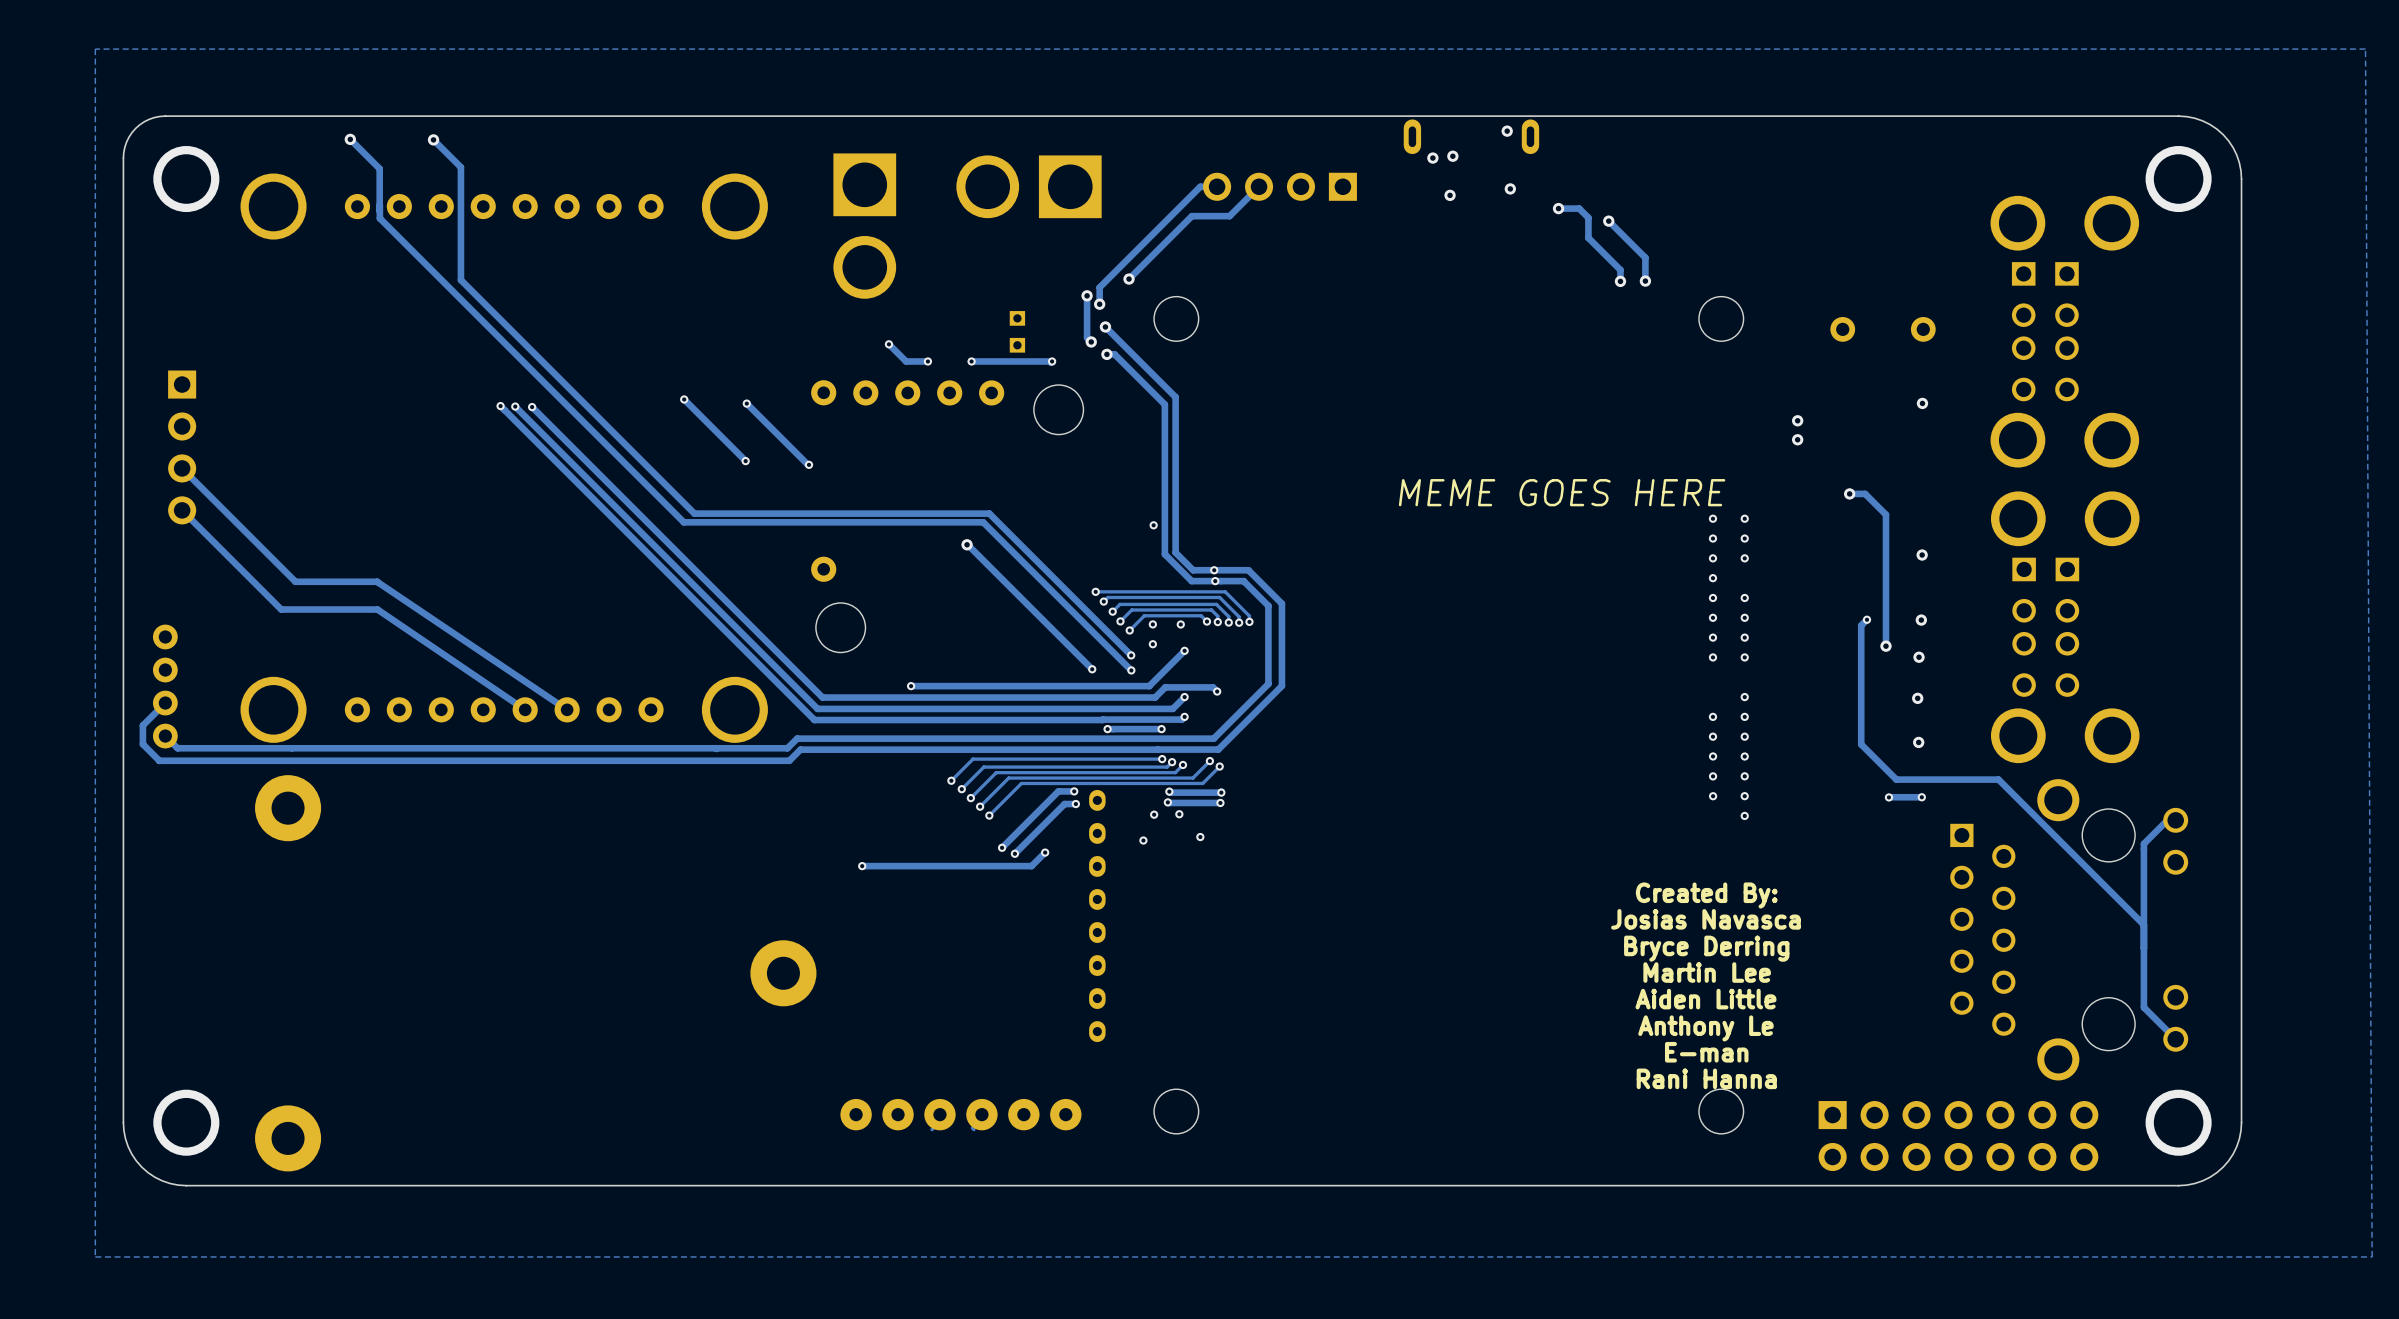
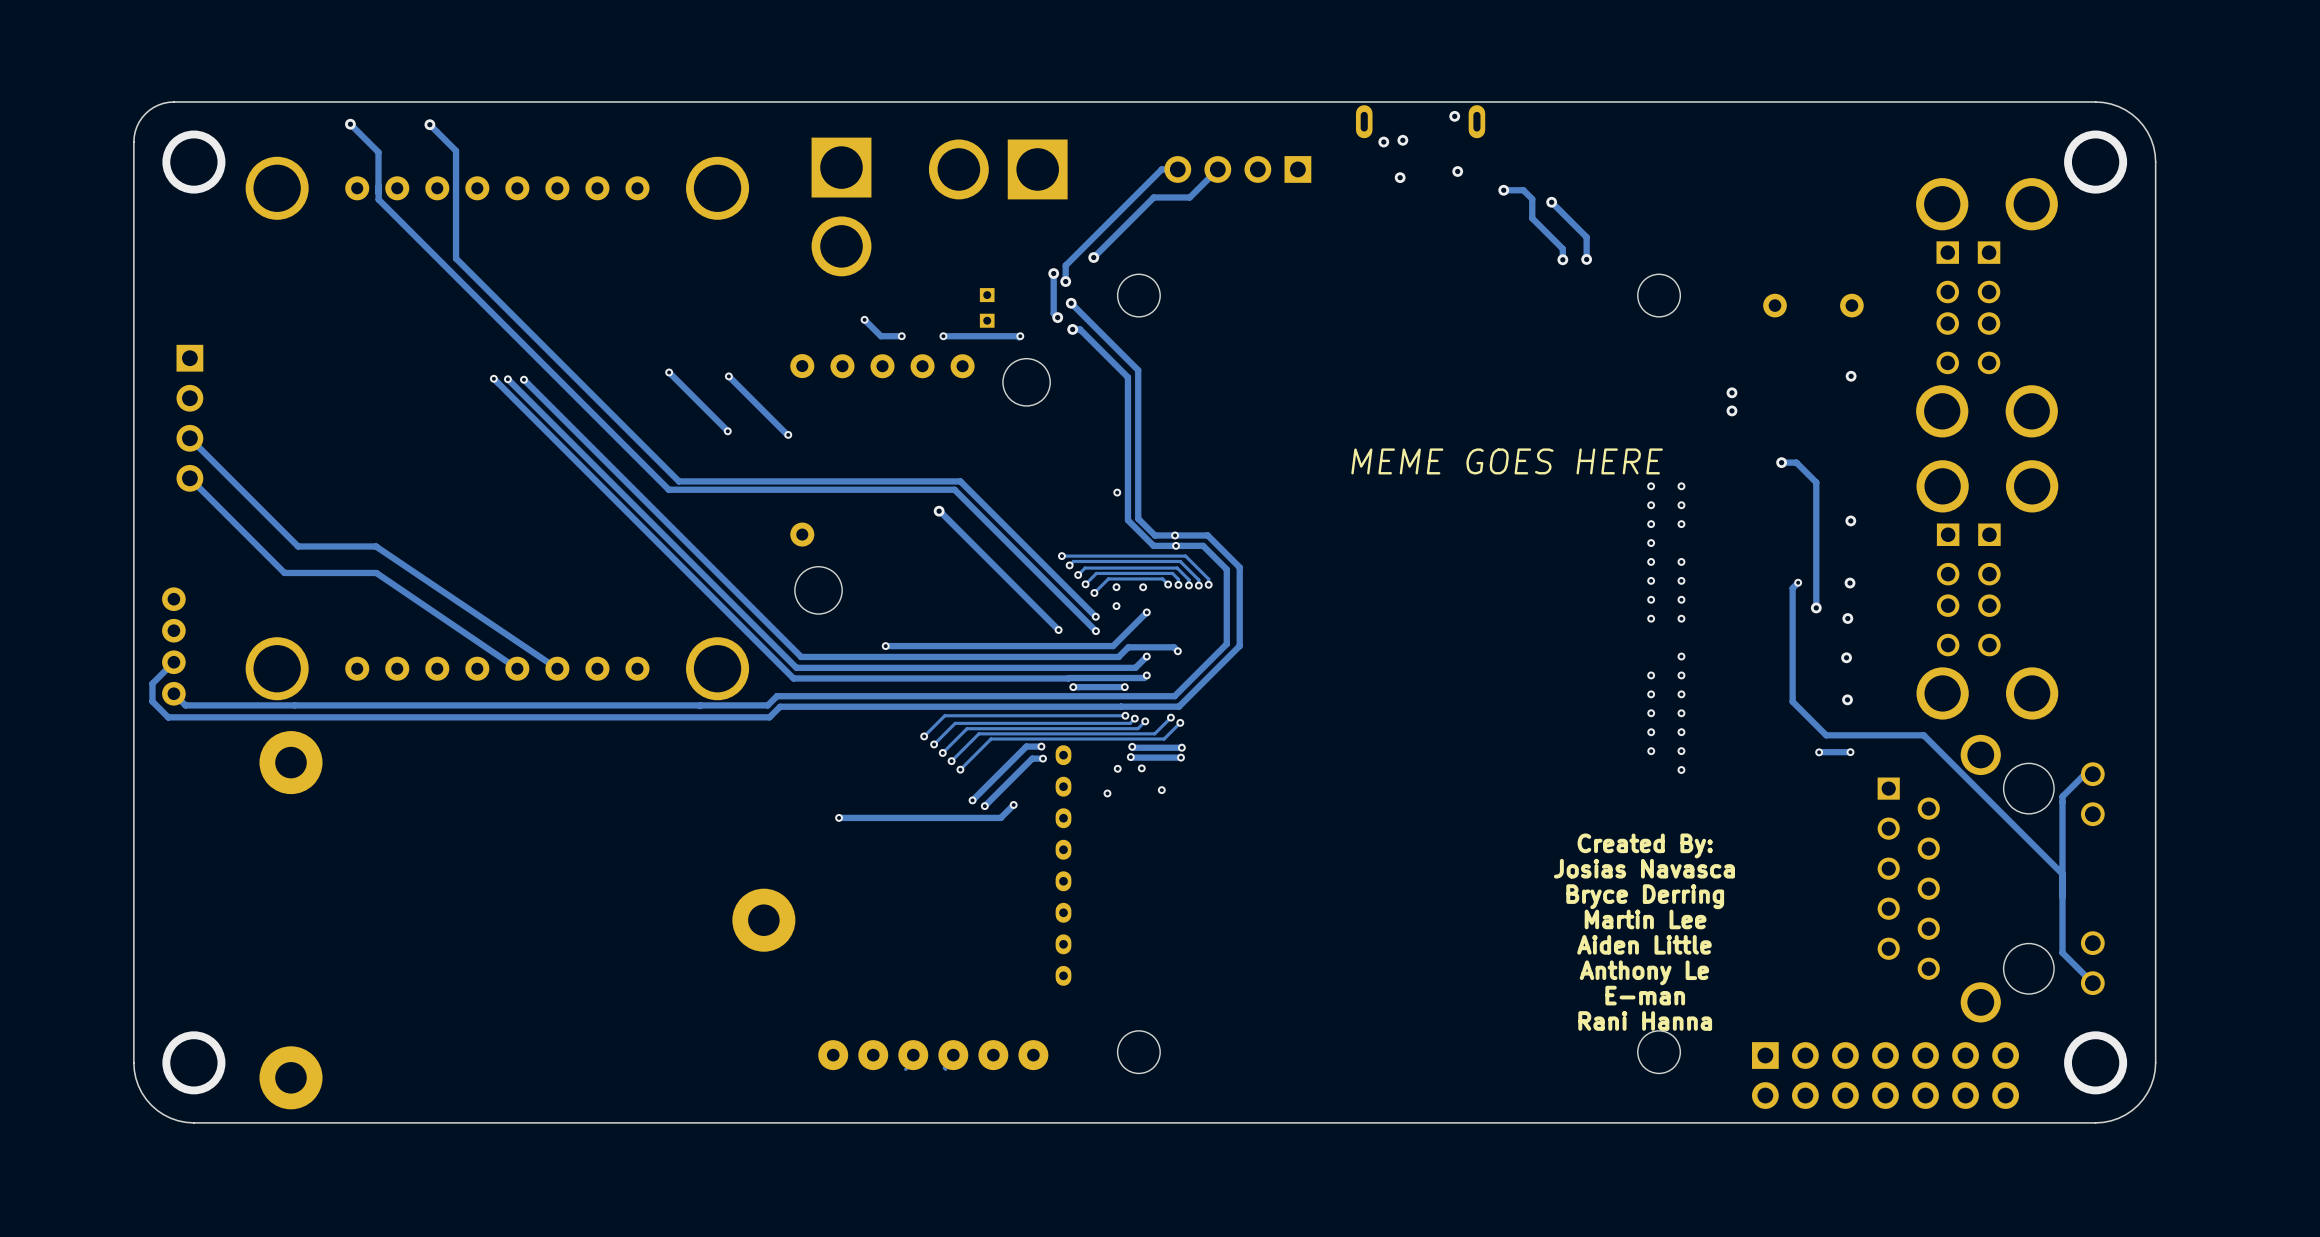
zone outline: (2365, 49) (2372, 1256) (95, 1256) (95, 49) (2365, 49) -> none

